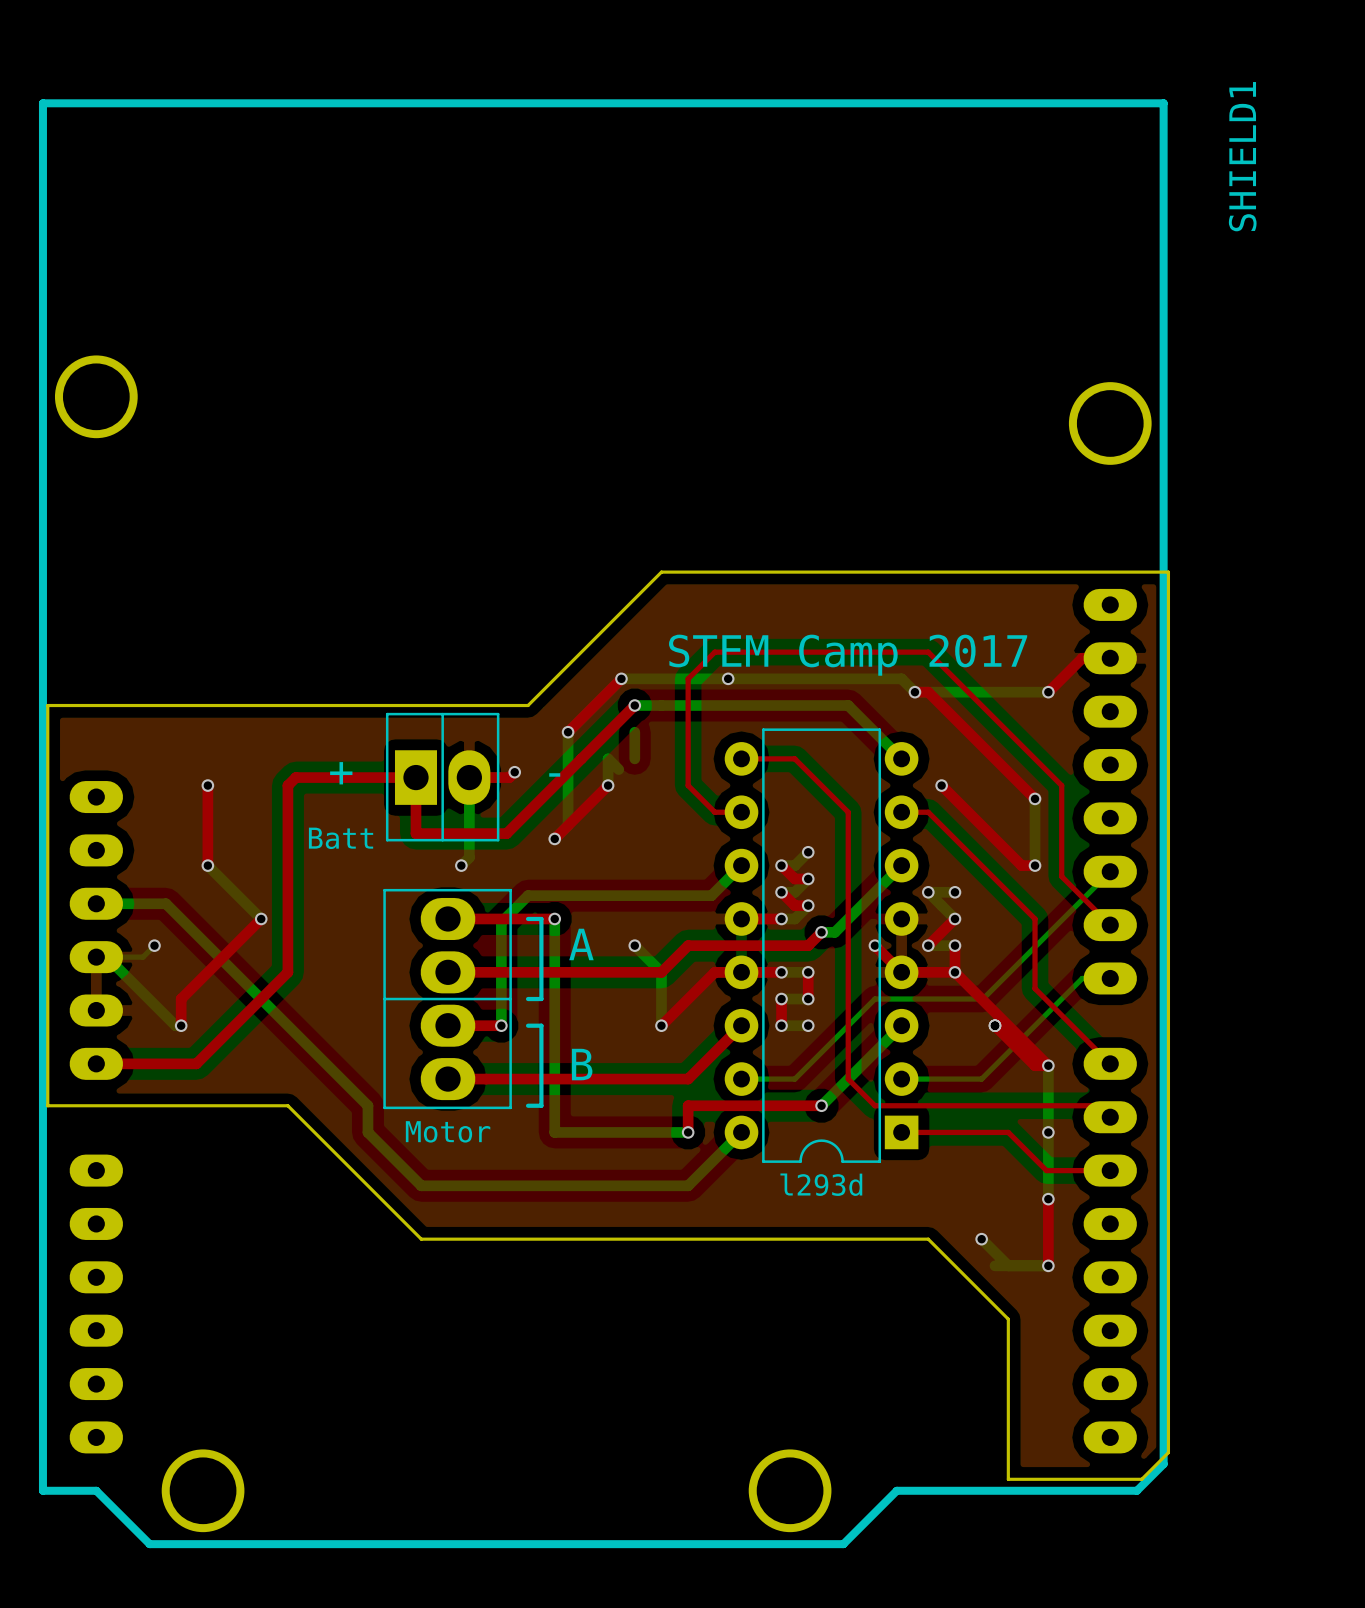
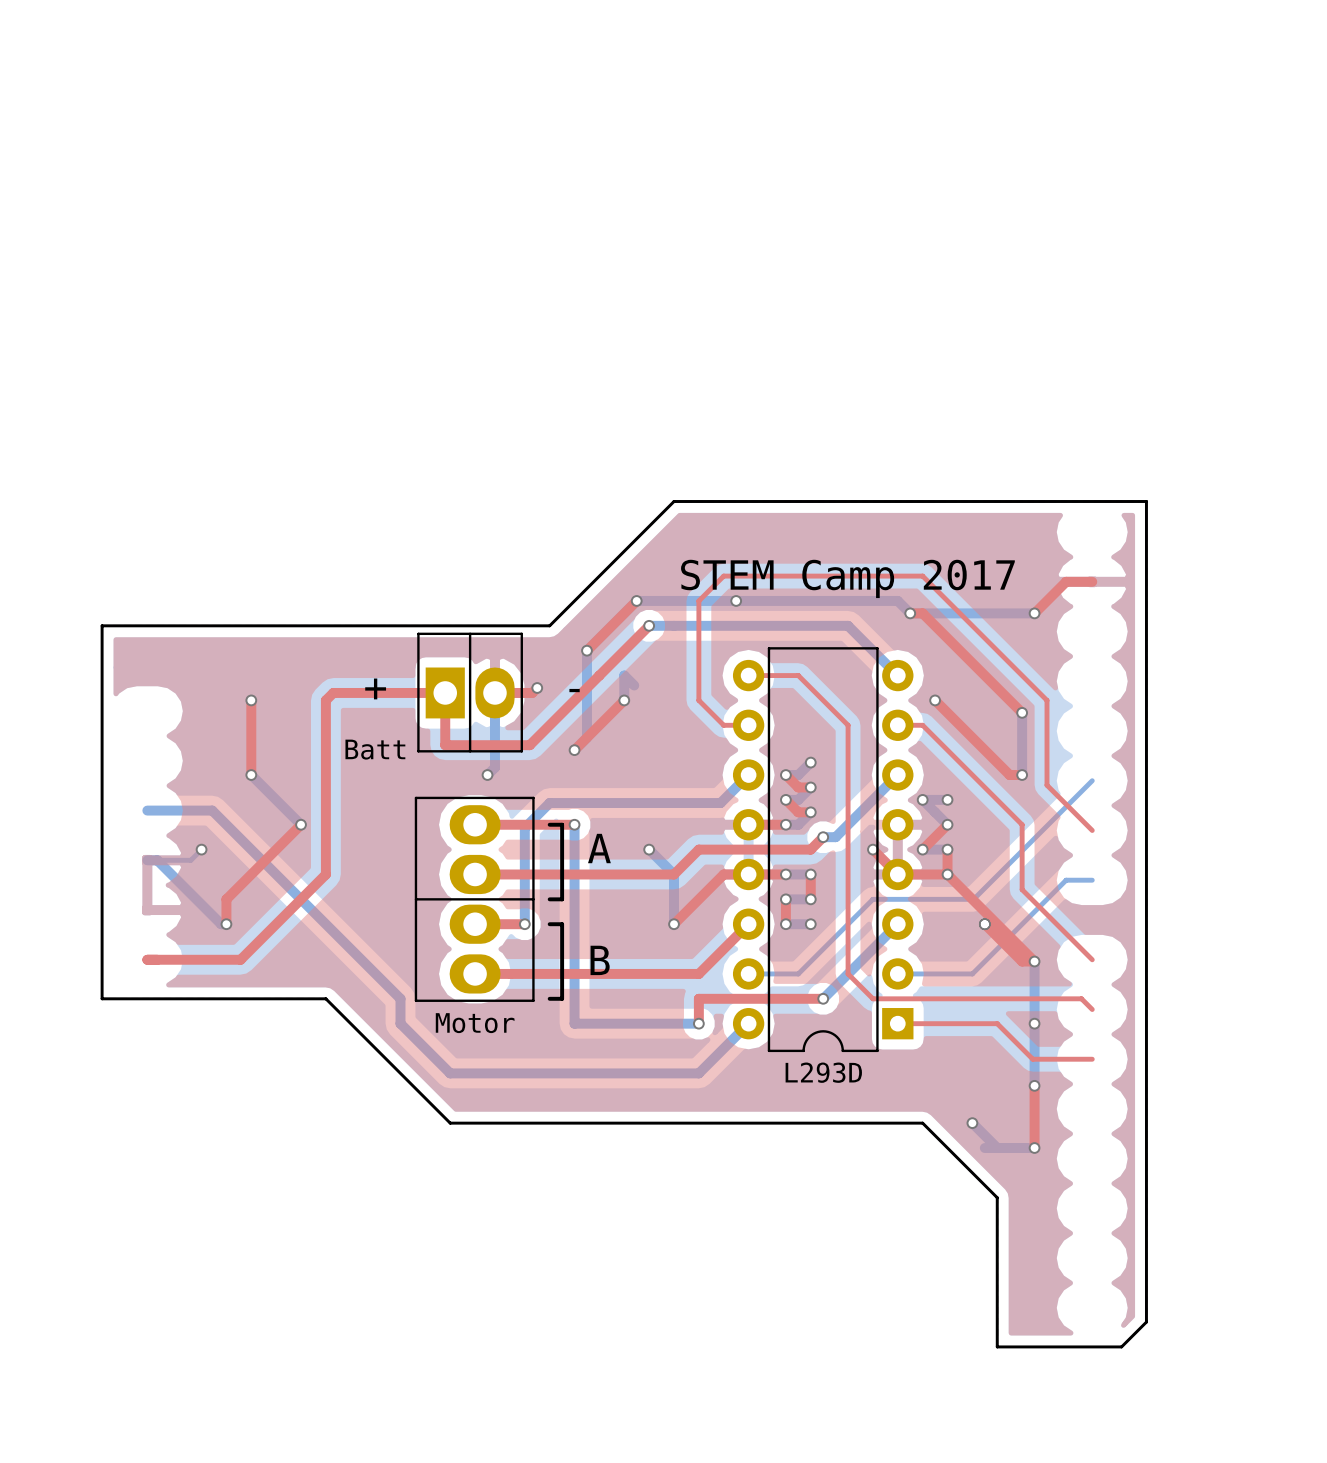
bottom track: (634, 732) (634, 758) -> none
SHIELD1: (603, 823) -> none
text: l293d (821, 1184) -> L293D (823, 1072)

